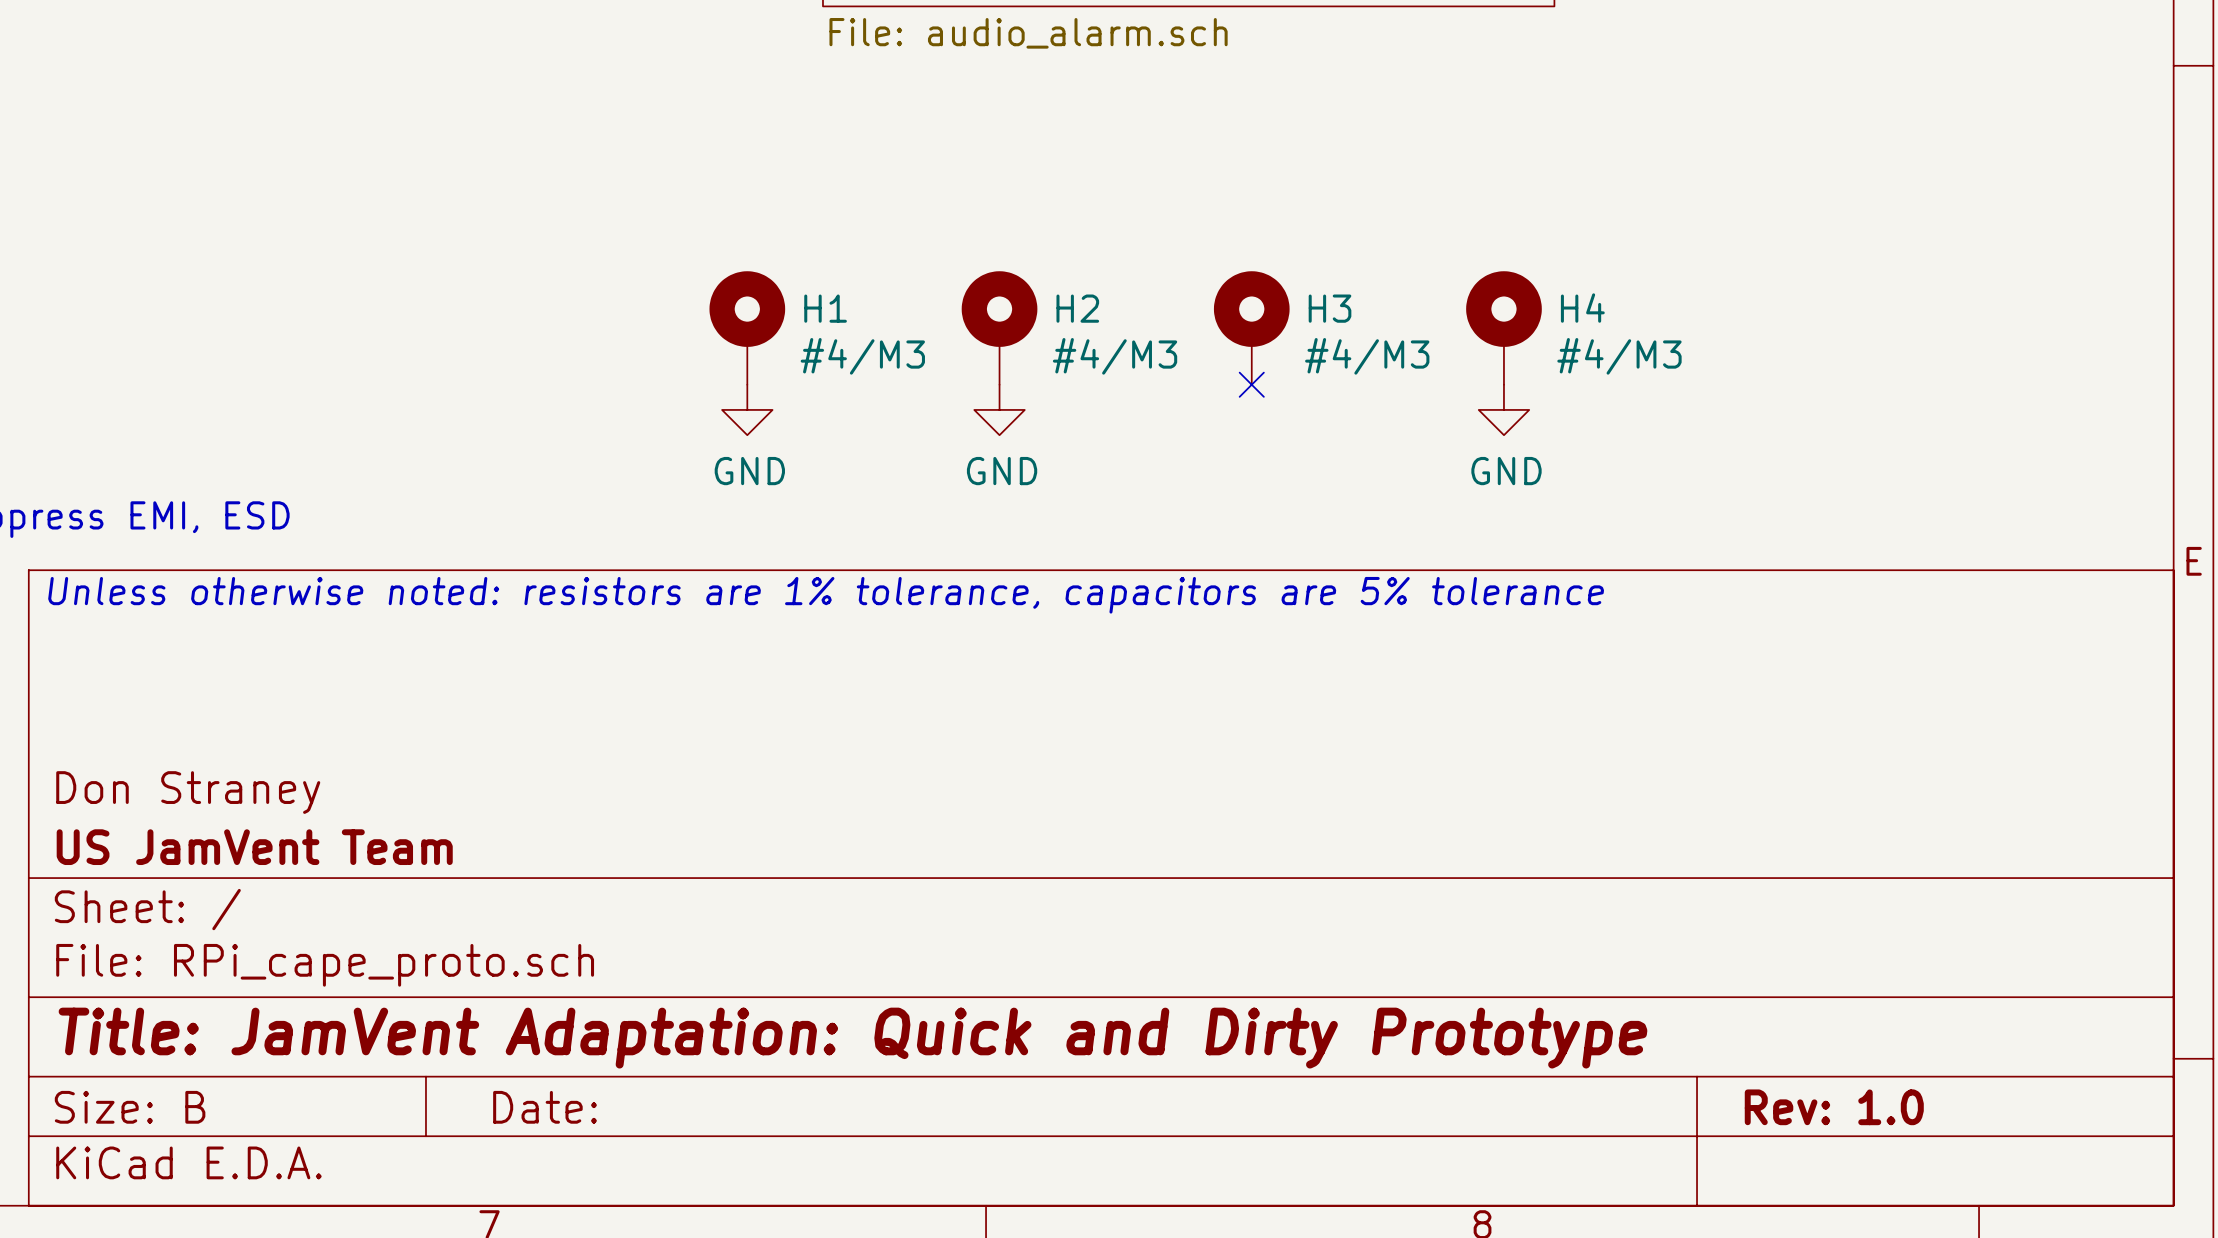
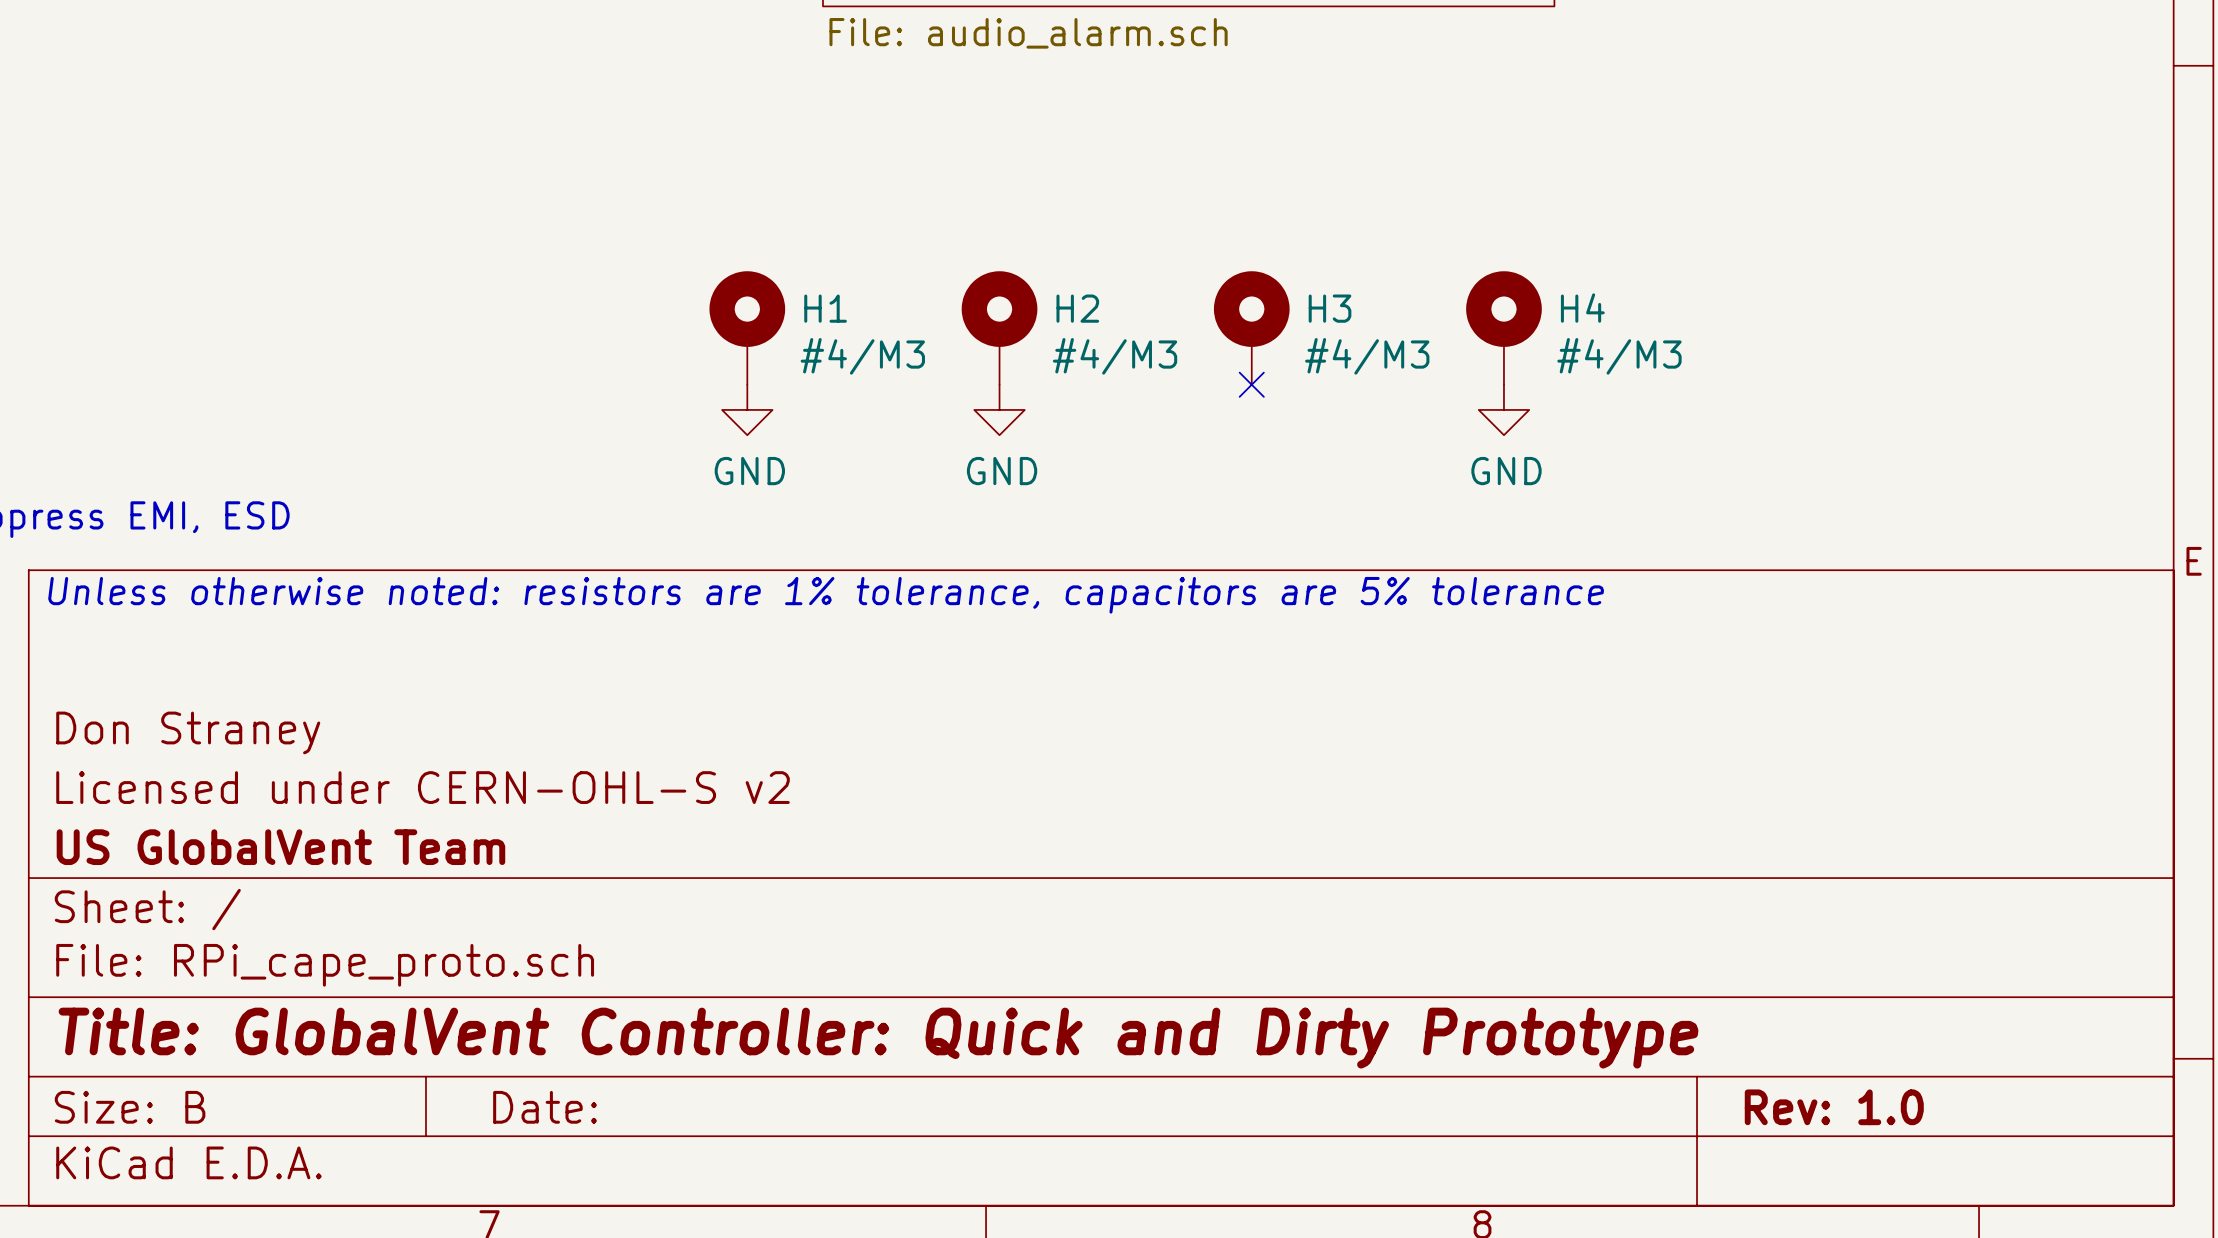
title block: none -> Don Straney (188, 732)
title block: Don Straney (188, 792) -> Licensed under CERN-OHL-S v2 (423, 787)
title block: US JamVent Team (254, 847) -> US GlobalVent Team (280, 847)
title block: Title: JamVent Adaptation: Quick and Dirty Prototype (853, 1038) -> Title: GlobalVent Controller: Quick and Dirty Prototype (878, 1038)

